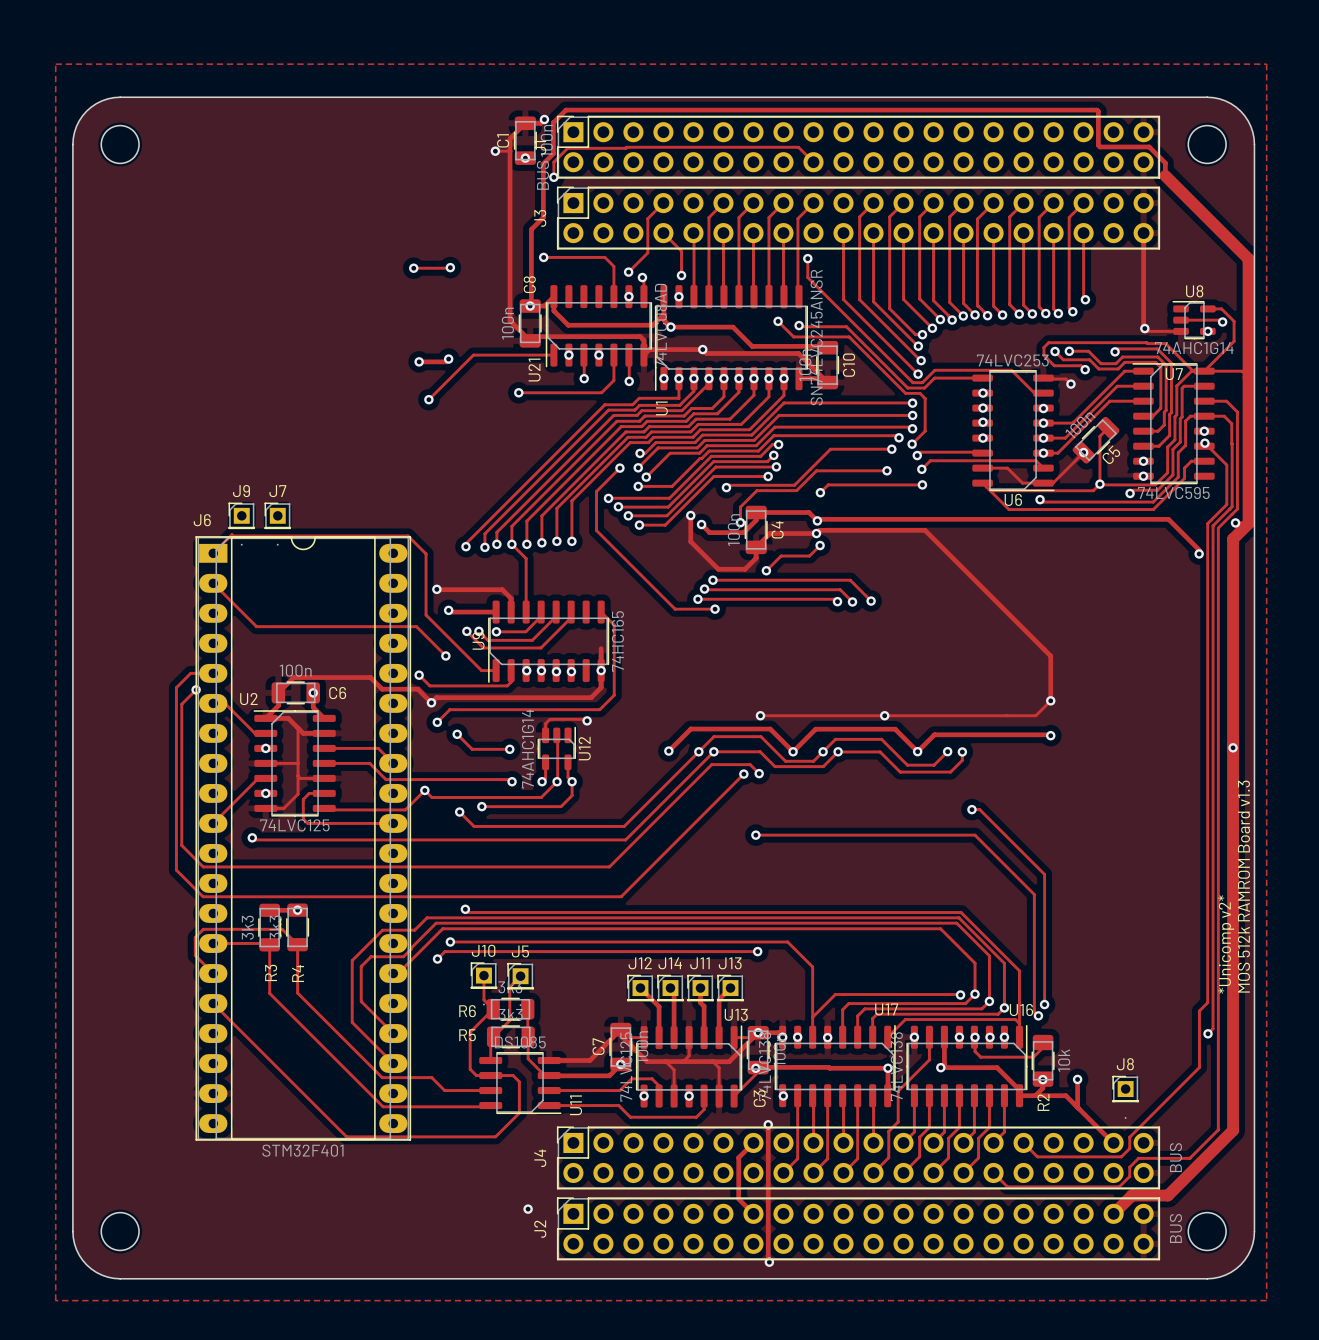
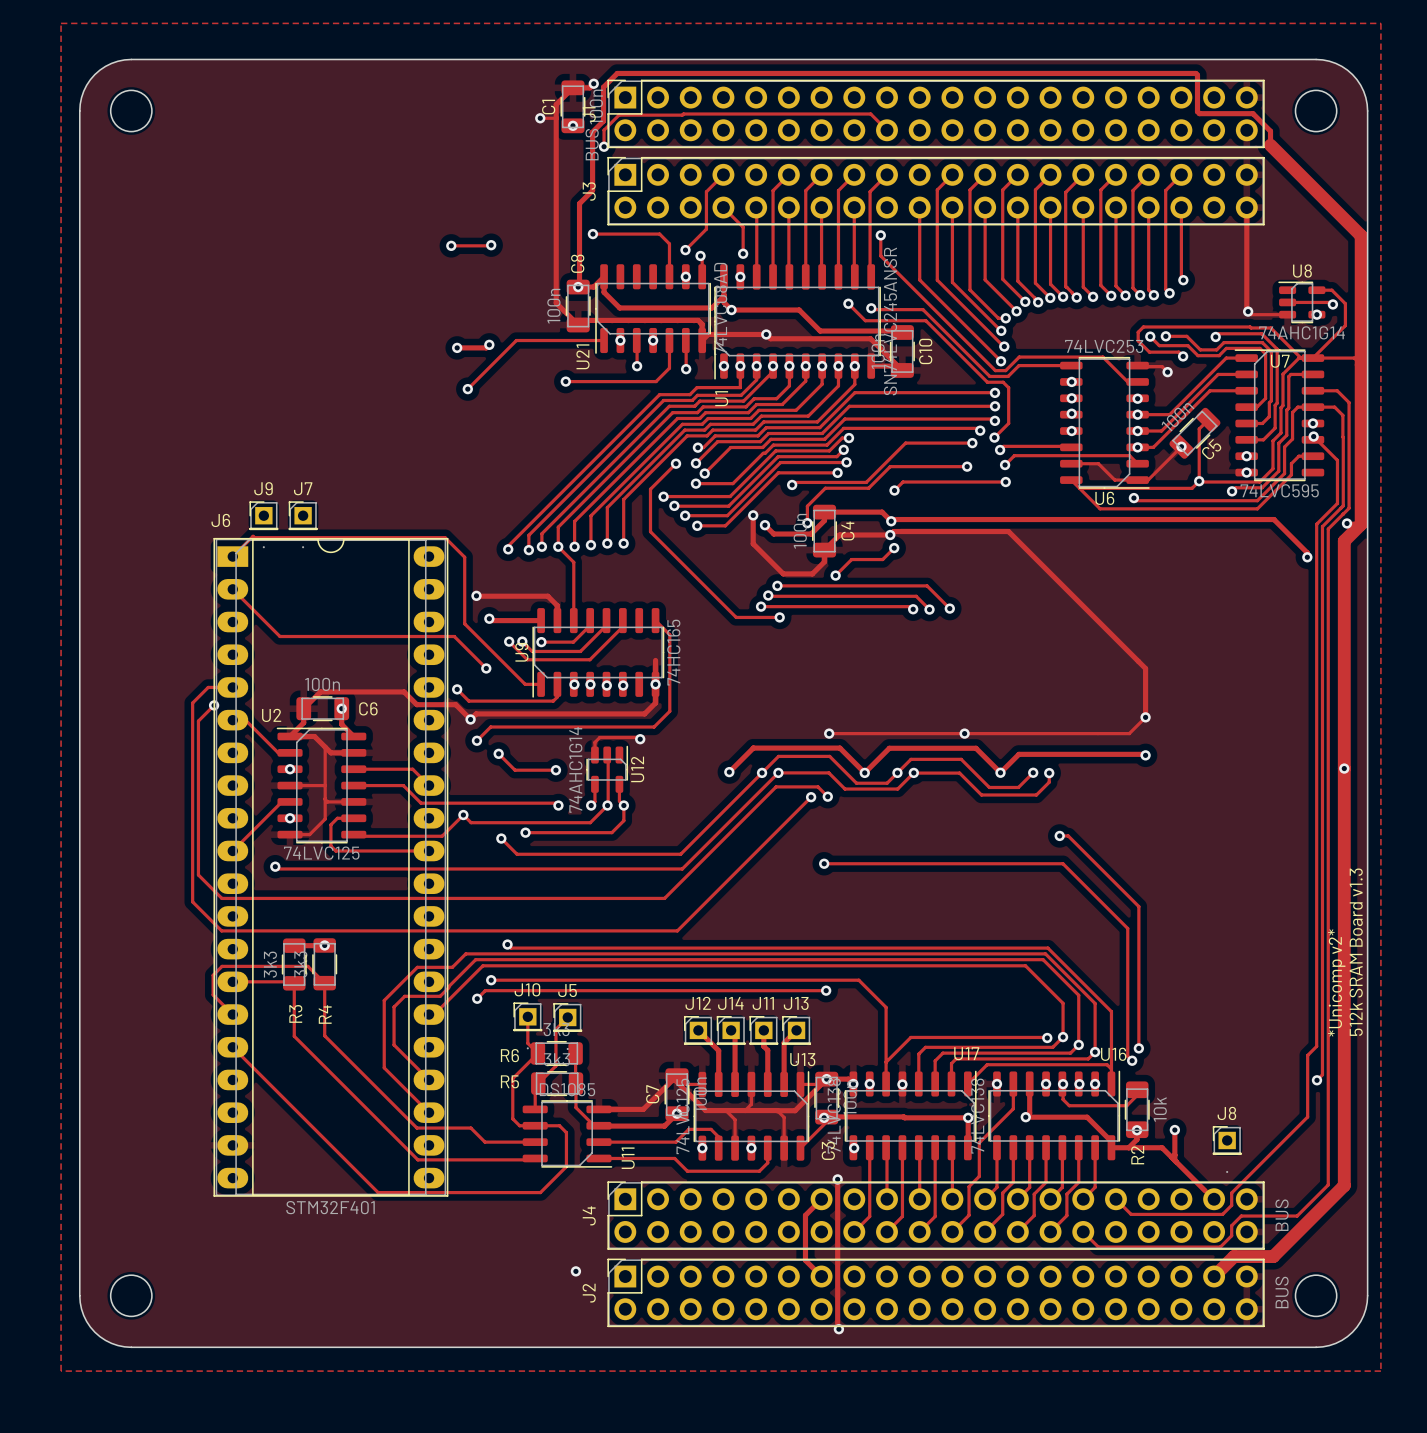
text: MOS 512k RAMROM Board v1.3 (1243, 886) -> 512k SRAM Board v1.3 (1356, 952)

